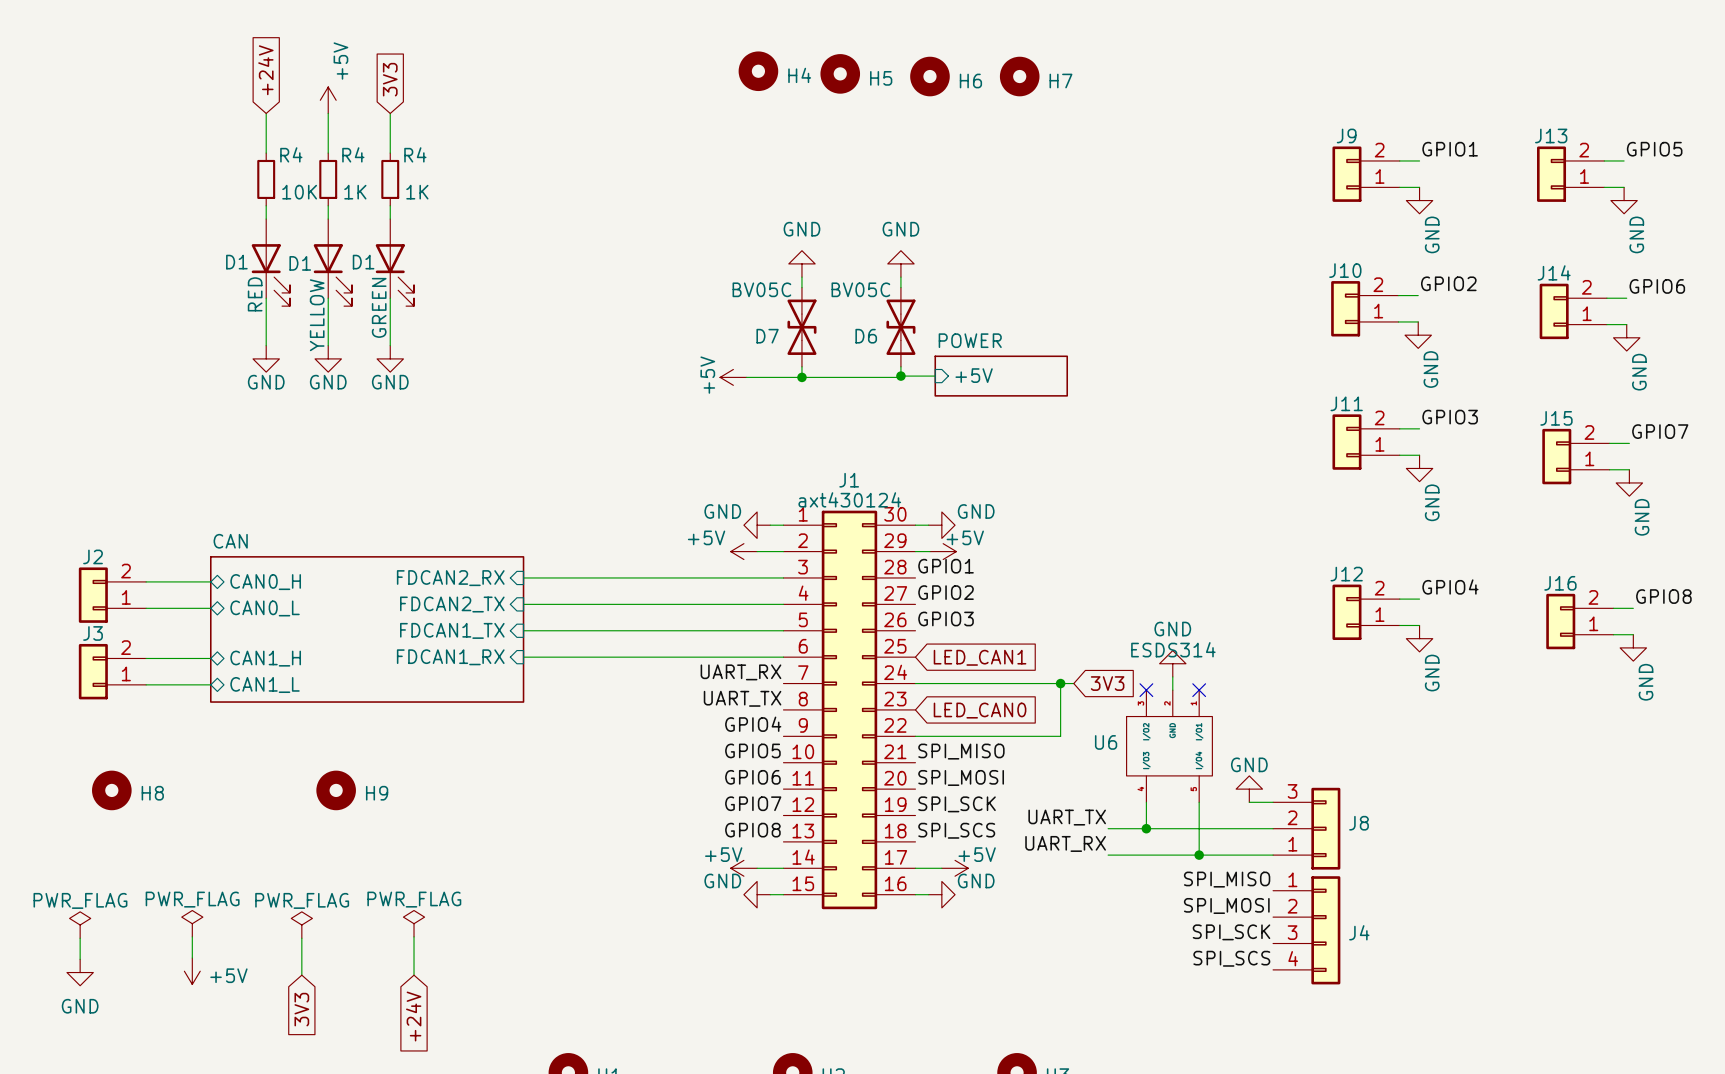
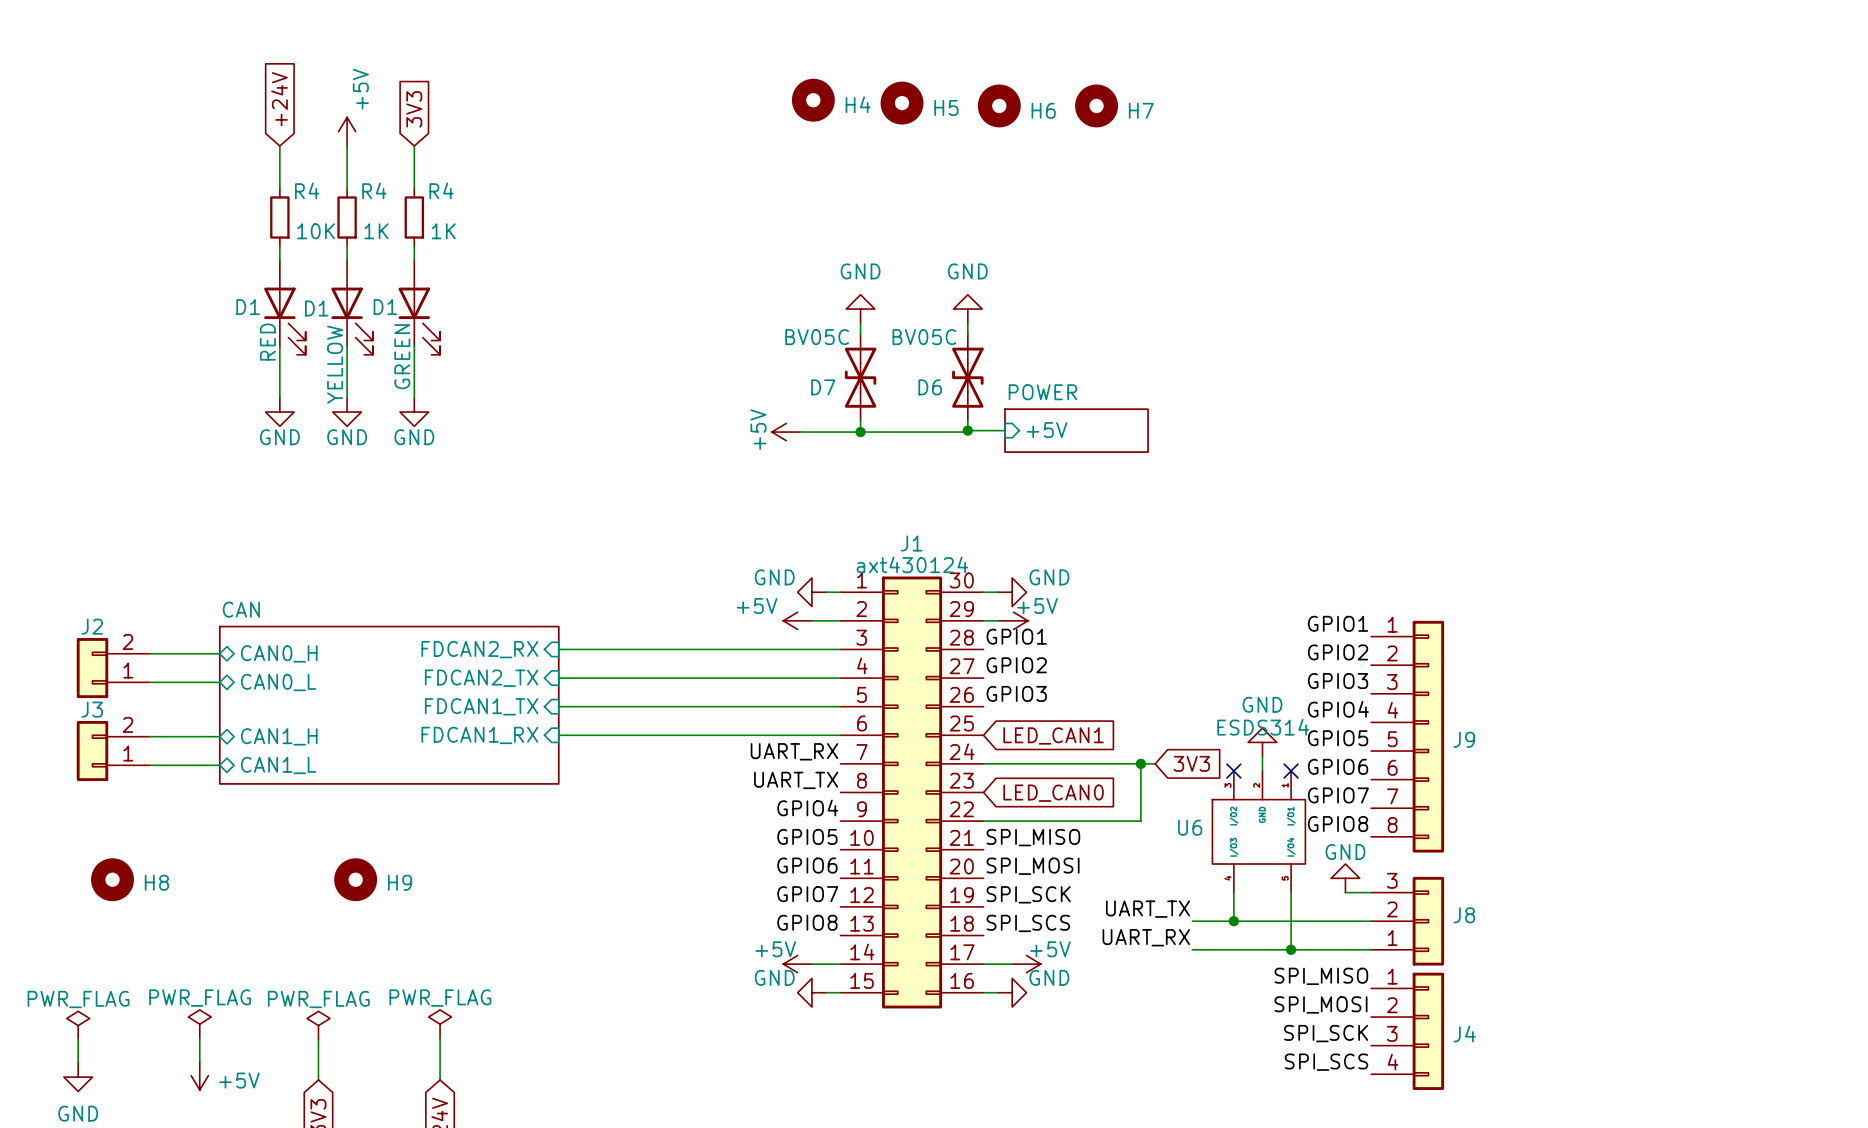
J9 name position: J9 (1346, 135) -> J9 (1464, 739)
J9 symbol: [1332, 146, 1400, 202] -> [1371, 620, 1445, 853]
label: GPIO1 (1450, 149) -> none
label: GPIO5 (1654, 149) -> none
wire: (1399, 160) (1419, 160) -> none
wire: (1604, 160) (1624, 160) -> none
J13: (1570, 174) -> none
wire: (1399, 187) (1419, 187) -> none
wire: (1604, 187) (1624, 187) -> none
power symbol: GND (1419, 200) -> none
power symbol: GND (1624, 200) -> none
label: GPIO2 (1448, 283) -> none
label: GPIO6 (1657, 286) -> none
wire: (1398, 295) (1418, 295) -> none
wire: (1606, 298) (1626, 298) -> none
J10: (1364, 308) -> none
J14: (1573, 311) -> none
wire: (1398, 321) (1418, 321) -> none
wire: (1606, 324) (1626, 324) -> none
power symbol: GND (1418, 335) -> none
power symbol: GND (1626, 337) -> none
label position: GPIO3 (1450, 417) -> GPIO3 (1338, 681)
wire: (1399, 428) (1419, 428) -> none
label: GPIO7 (1660, 431) -> none
J11: (1366, 442) -> none
wire: (1609, 443) (1629, 443) -> none
wire: (1399, 455) (1419, 455) -> none
J15: (1575, 456) -> none
power symbol: GND (1419, 468) -> none
wire: (1609, 469) (1629, 469) -> none
power symbol: GND (1629, 482) -> none
label: none -> GPIO1 (1338, 623)
label: none -> GPIO2 (1338, 652)
label position: GPIO4 (1450, 587) -> GPIO4 (1338, 709)
label: GPIO8 (1663, 596) -> none
wire: (1399, 599) (1419, 599) -> none
wire: (1613, 608) (1633, 608) -> none
J12: (1366, 612) -> none
J16: (1579, 621) -> none
wire: (1399, 625) (1419, 625) -> none
wire: (1613, 634) (1633, 634) -> none
power symbol: GND (1419, 638) -> none
power symbol: GND (1633, 647) -> none
label: none -> GPIO5 (1338, 738)
label: none -> GPIO6 (1338, 766)
label: none -> GPIO7 (1338, 795)
label: none -> GPIO8 (1338, 824)

